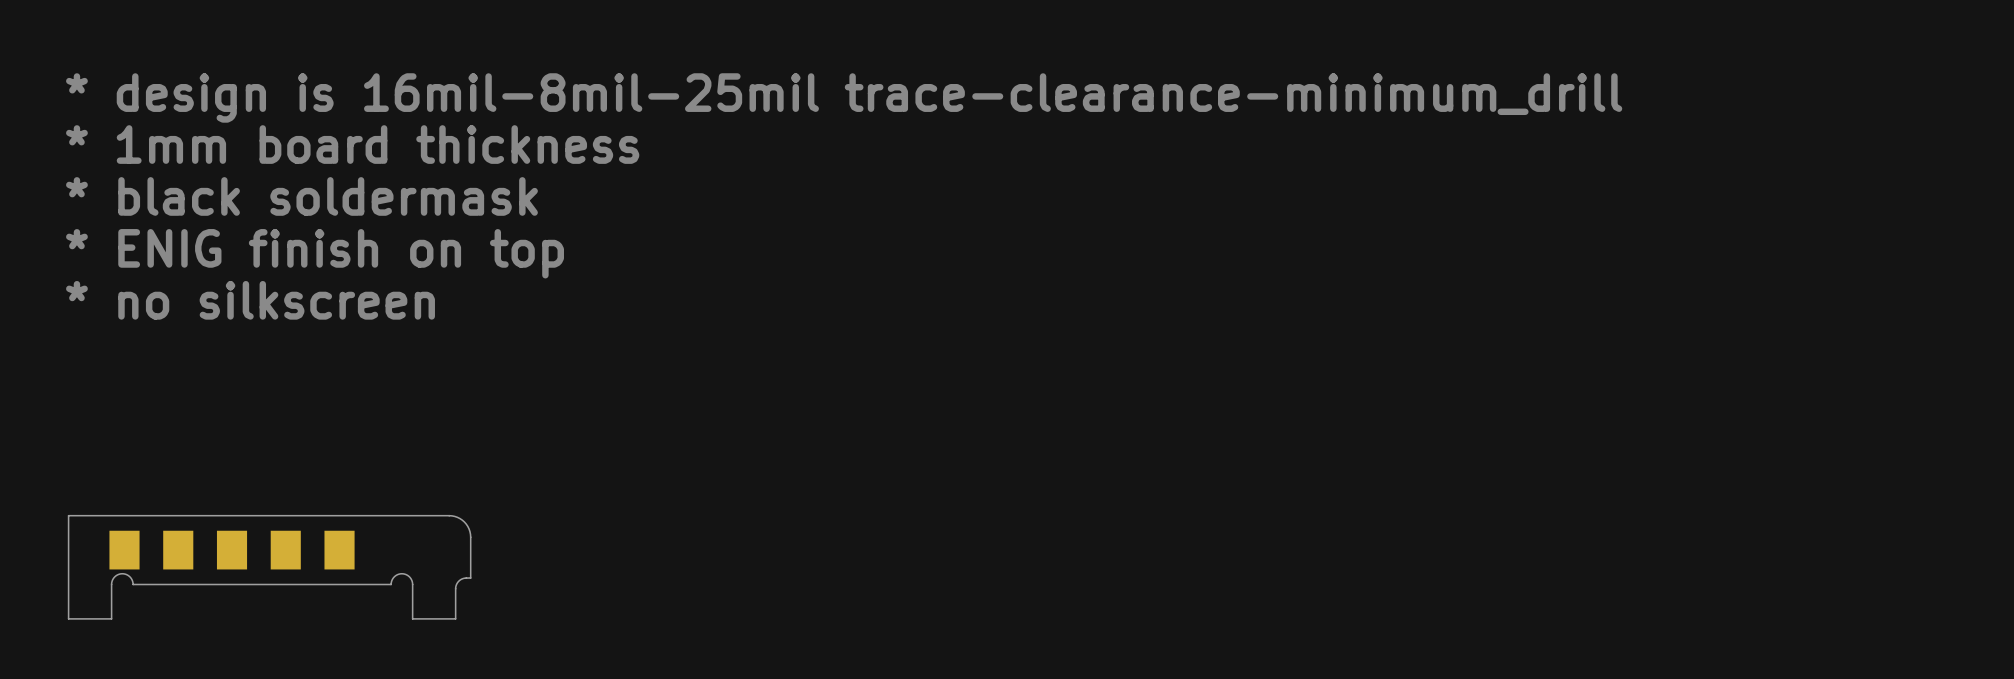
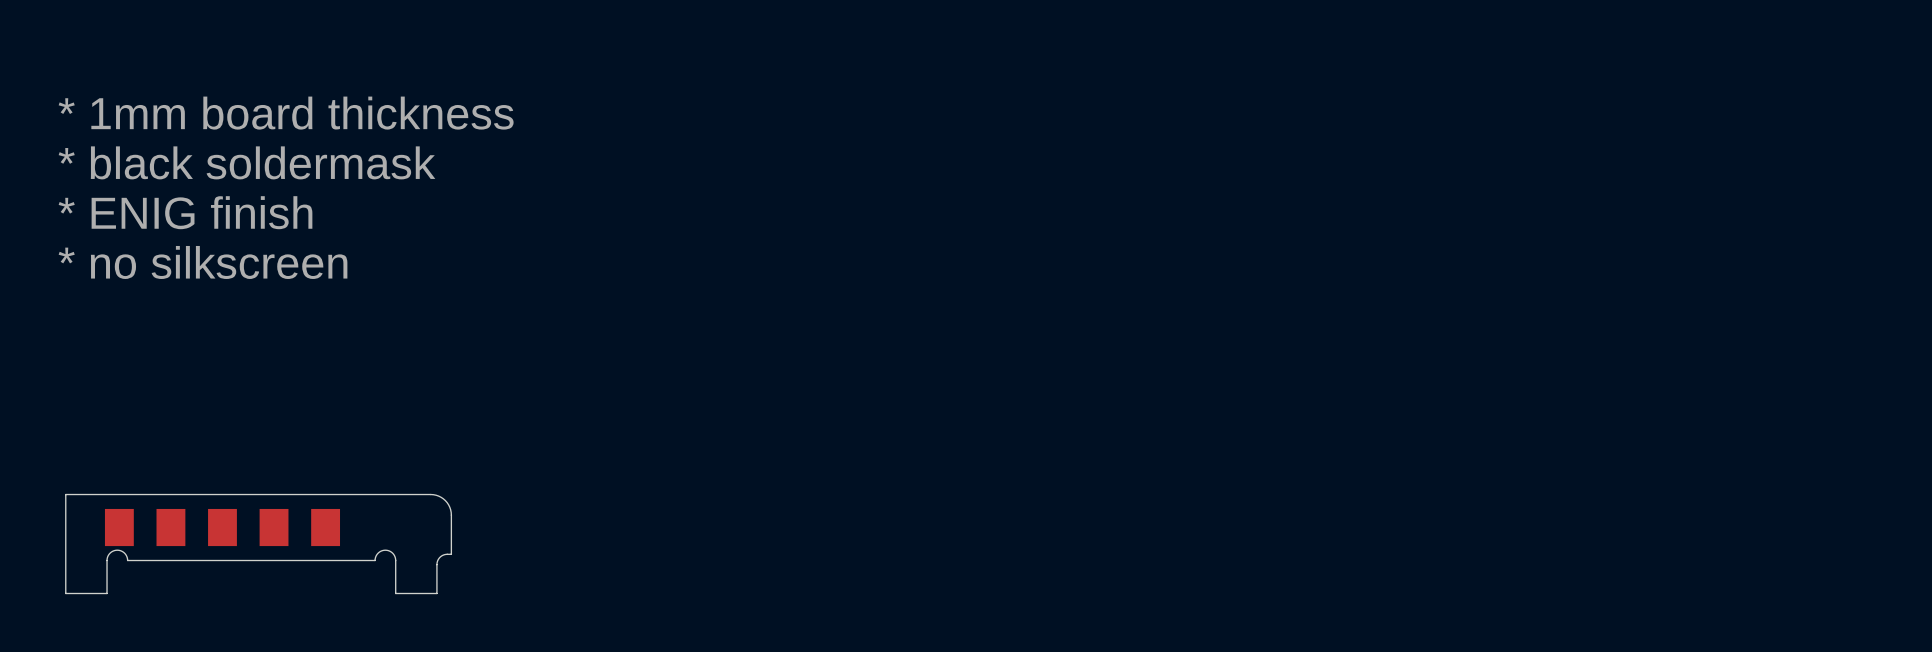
text: * design is 16mil-8mil-25mil trace-clearance-minimum_drill (844, 97) -> none
text position: * 1mm board thickness (352, 144) -> * 1mm board thickness (286, 113)
text position: * black soldermask (301, 196) -> * black soldermask (246, 162)
text: * ENIG finish on top (315, 253) -> * ENIG finish (185, 212)
text position: * no silkscreen (250, 300) -> * no silkscreen (203, 262)

